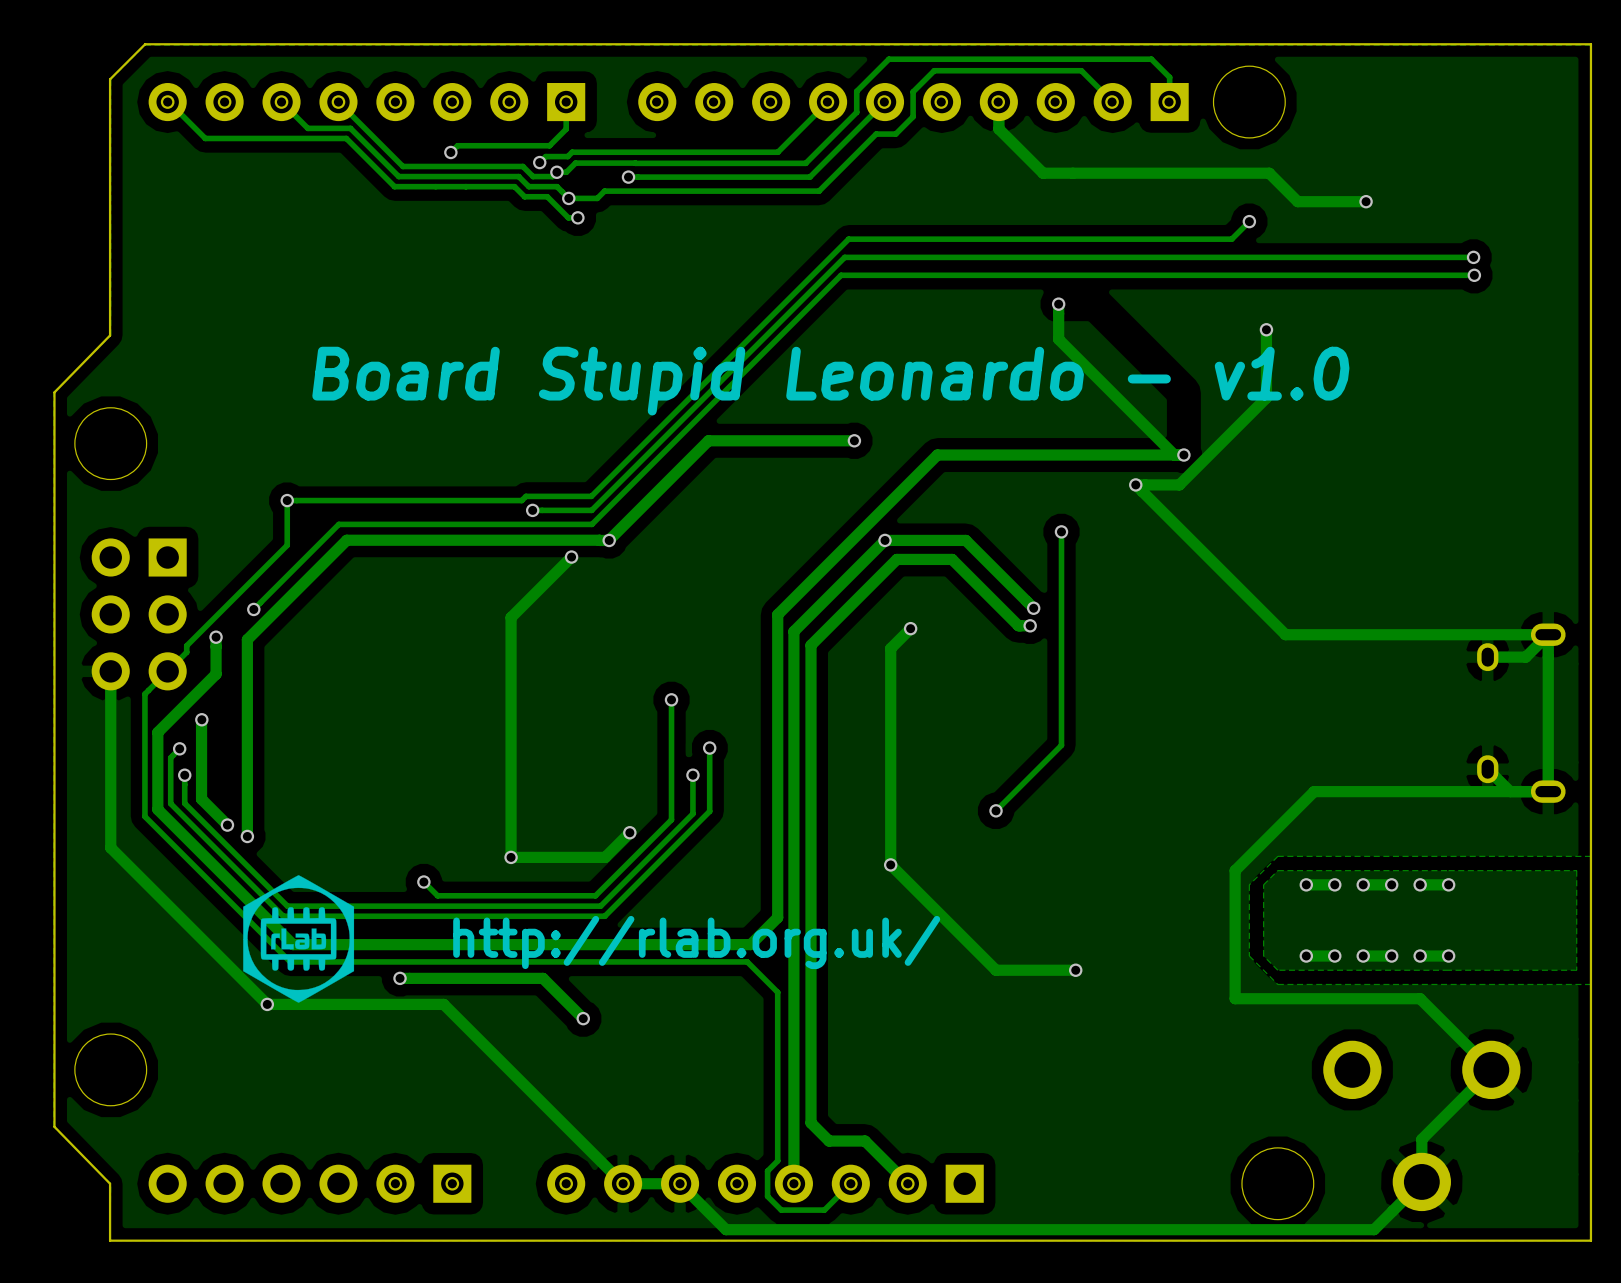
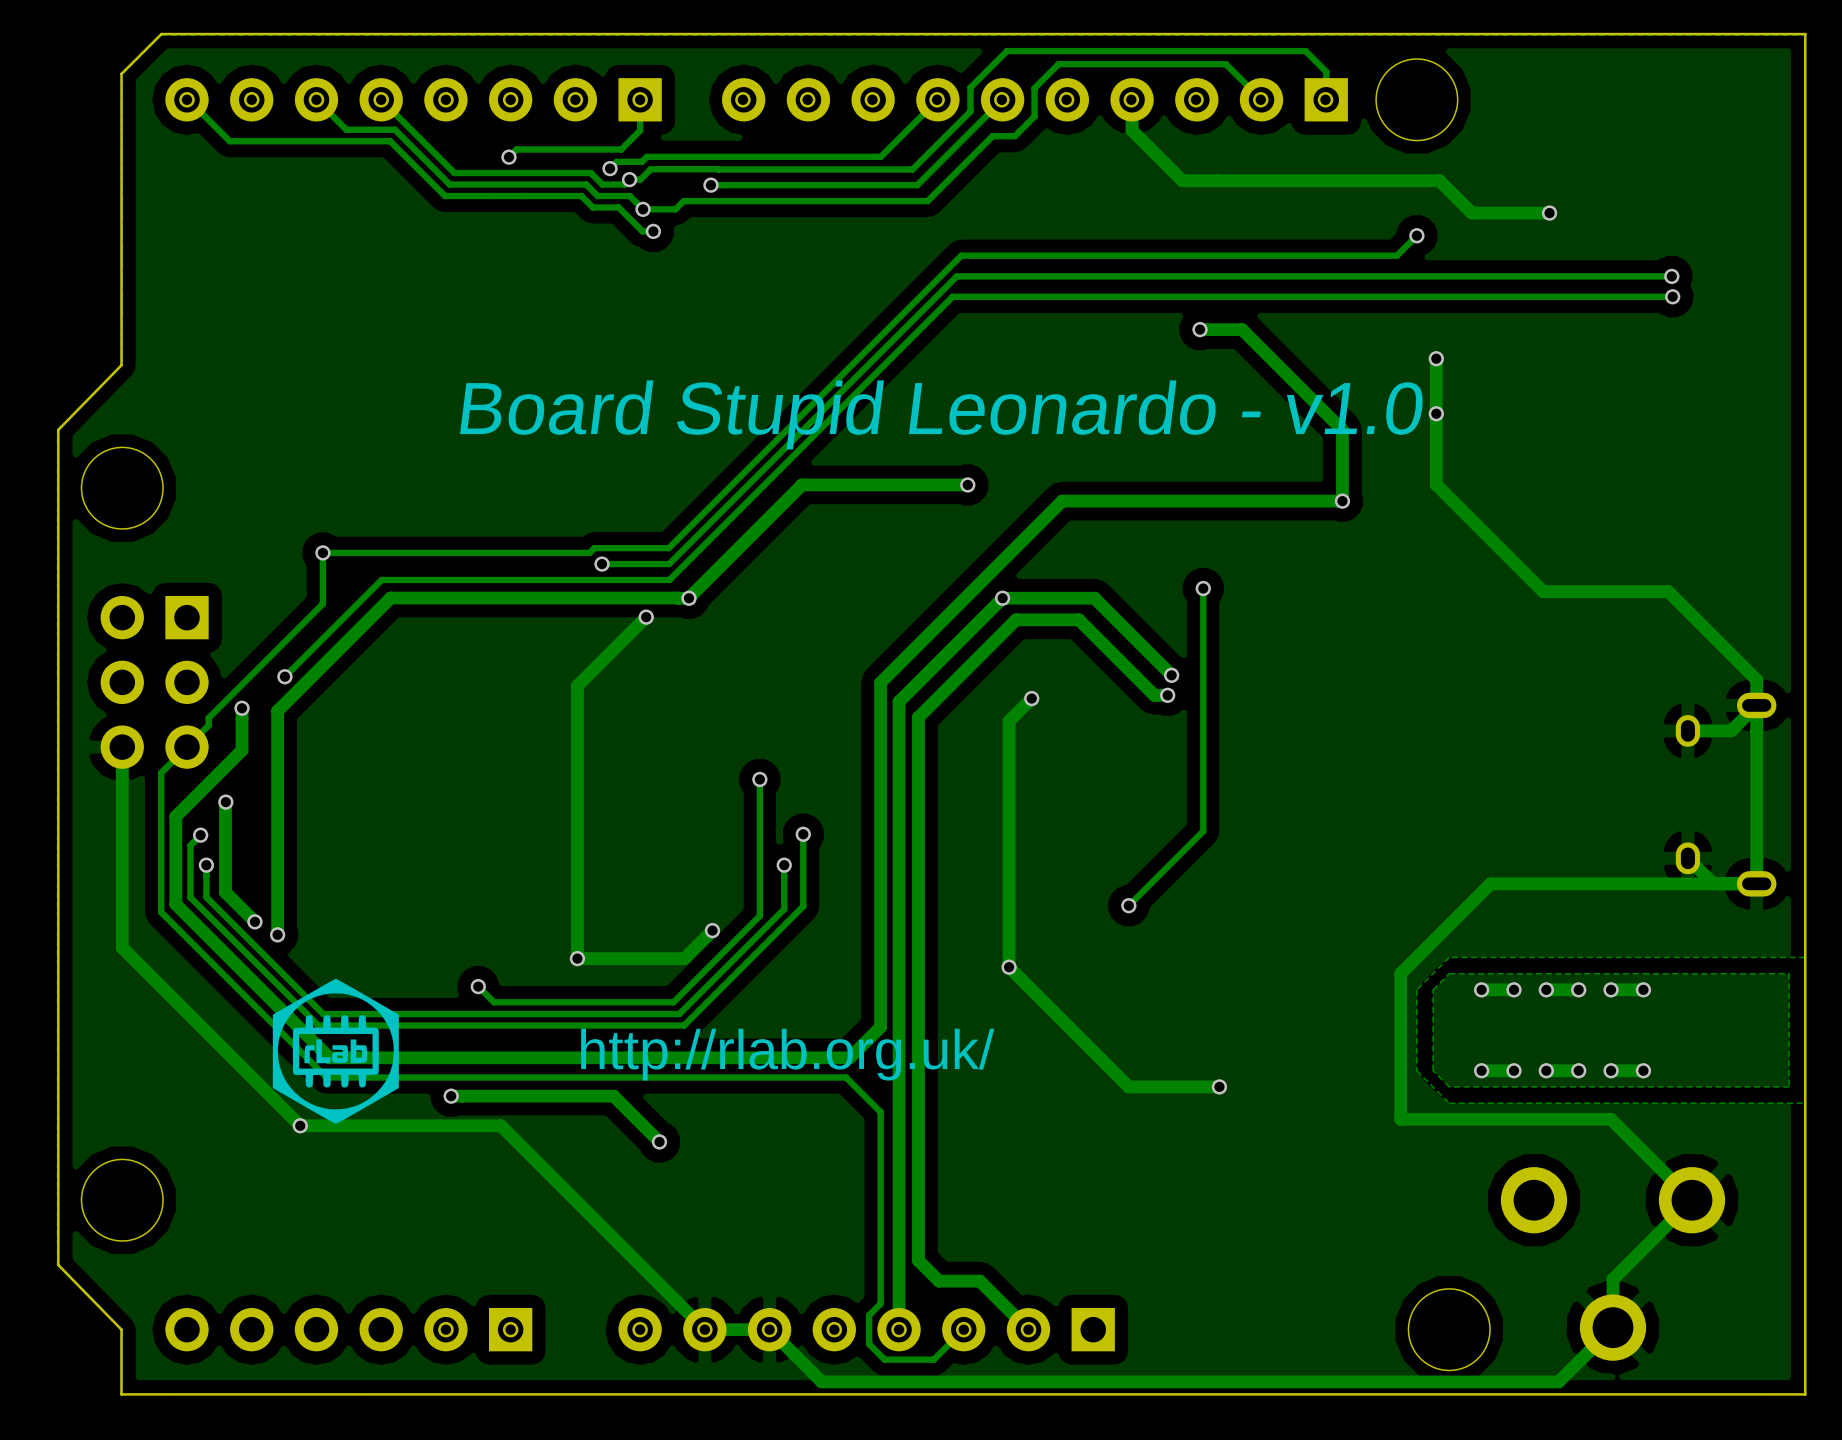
track: (1058, 304) (1058, 339) (1174, 455) -> (1200, 329) (1242, 329) (1342, 429) (1342, 501)
via: none -> (1436, 413)
track: (1266, 397) (1179, 484) (1135, 484) (1285, 634) (1548, 634) -> (1436, 436) (1436, 484) (1543, 591) (1668, 591) (1756, 679) (1756, 705)
via: (1135, 484) -> none

